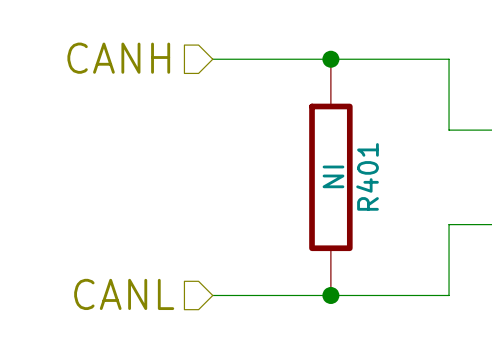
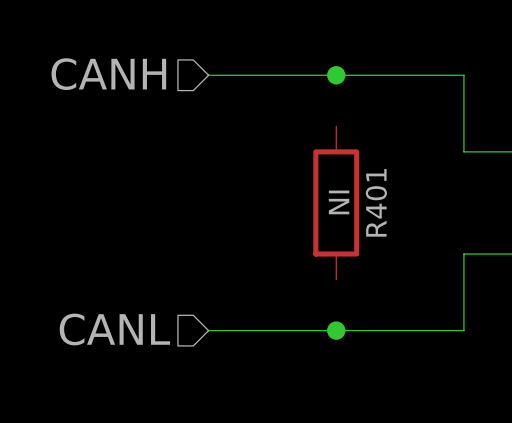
R401 symbol: [309, 59, 353, 296] -> [313, 126, 360, 280]

